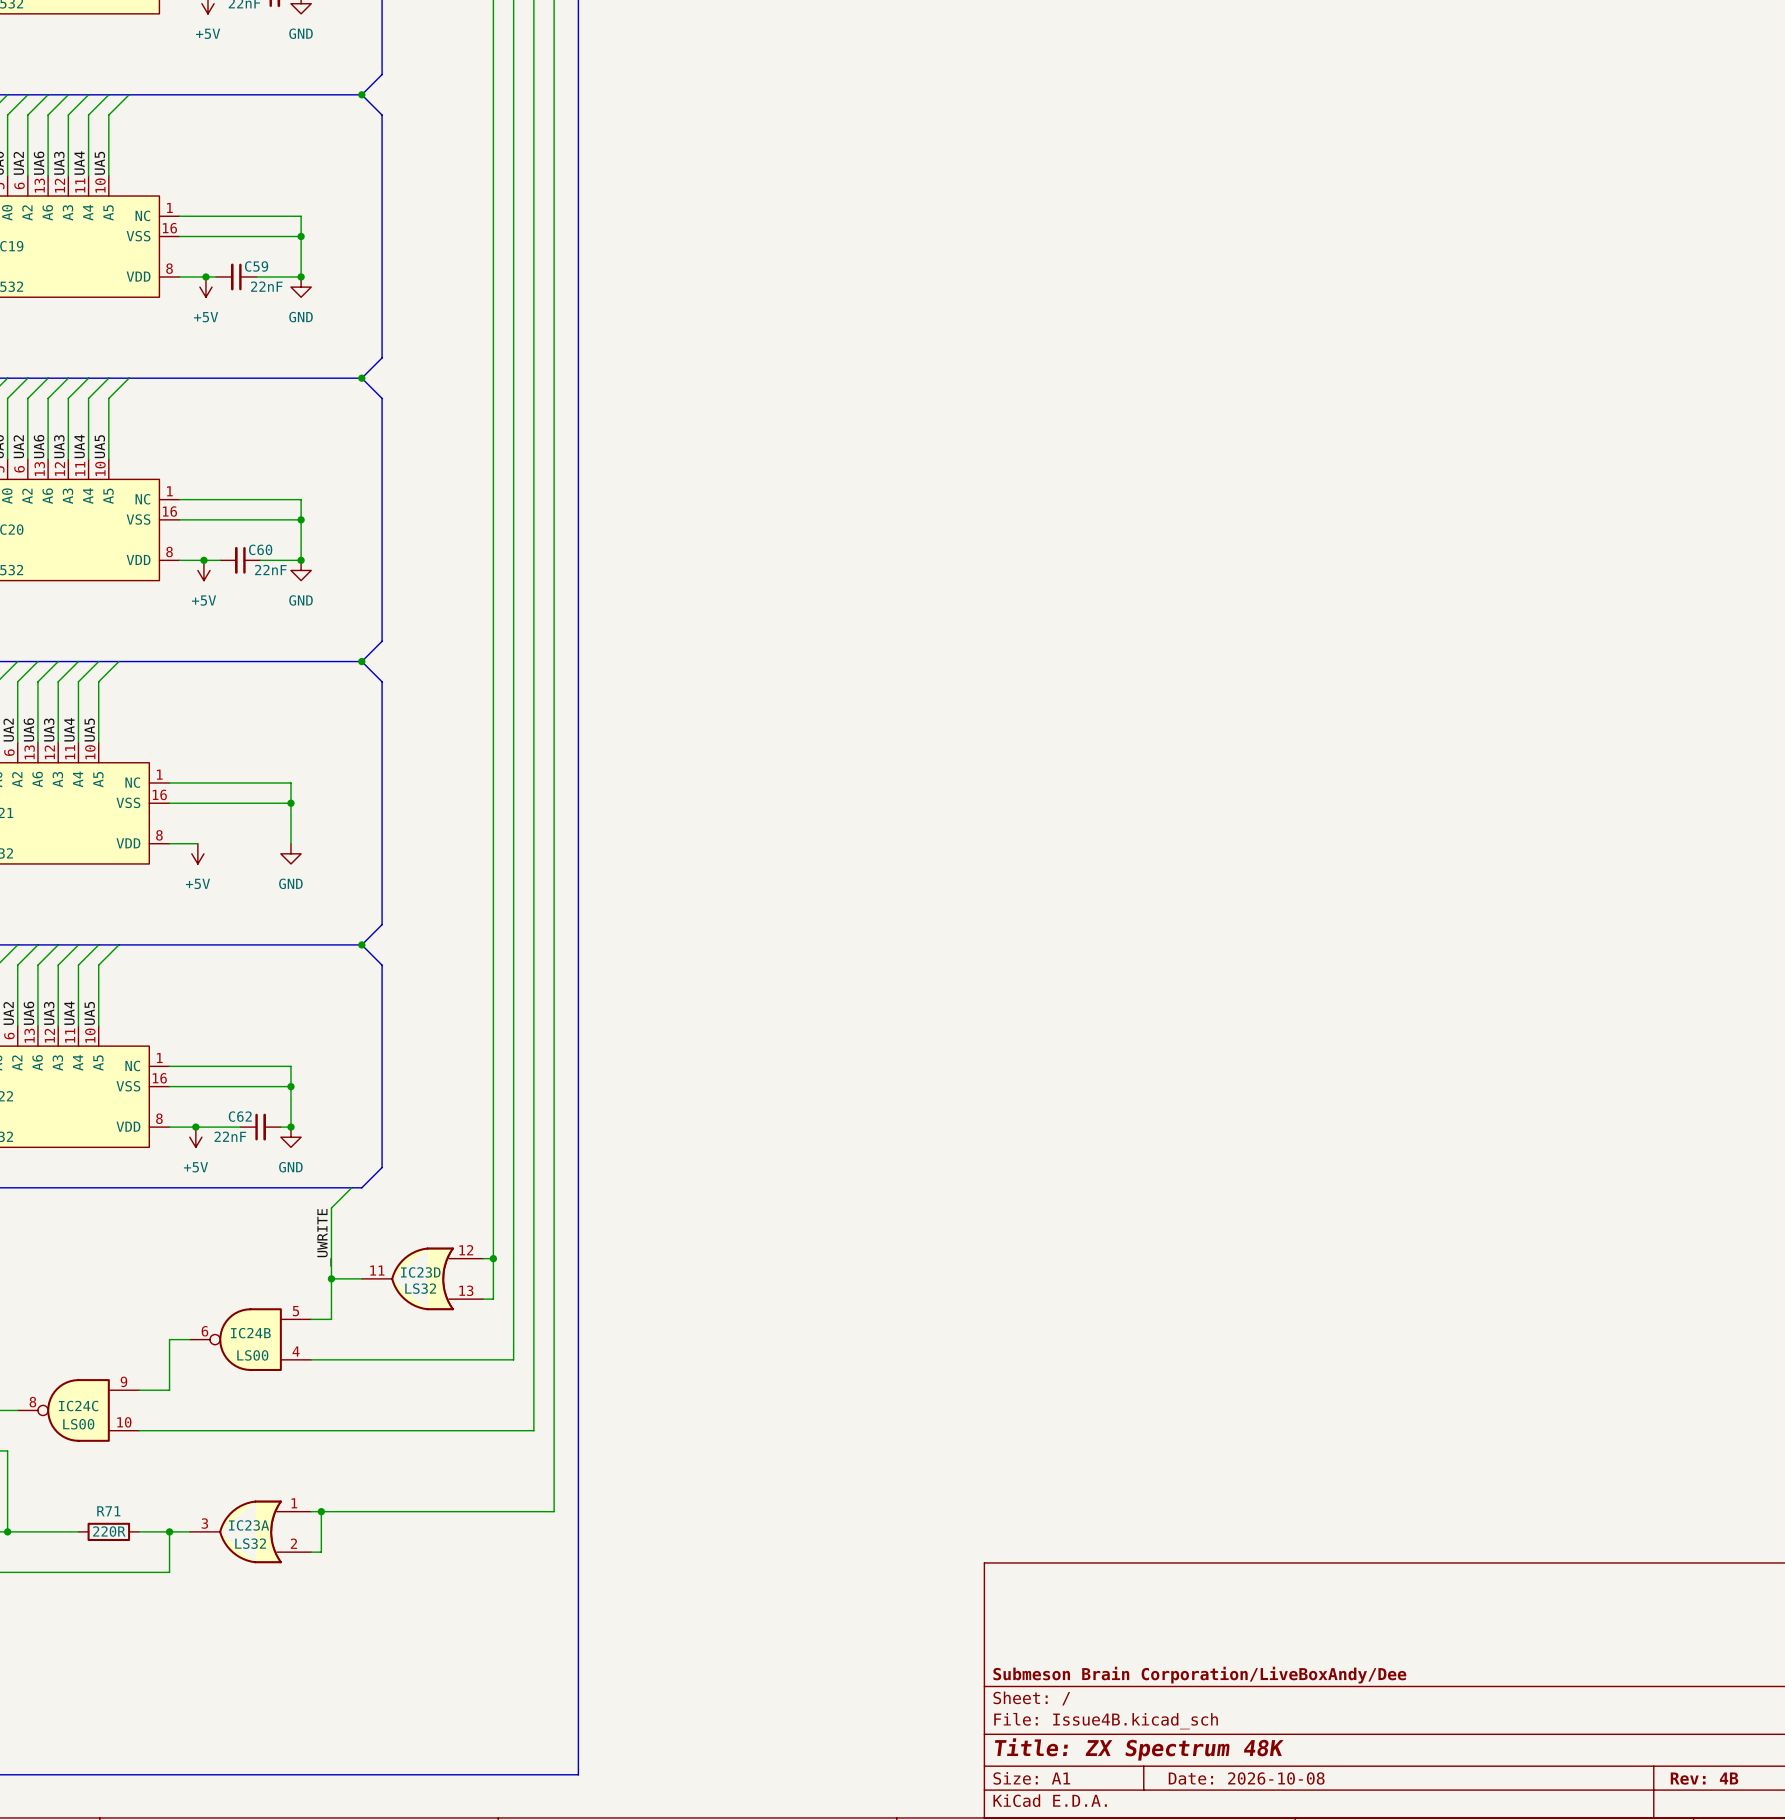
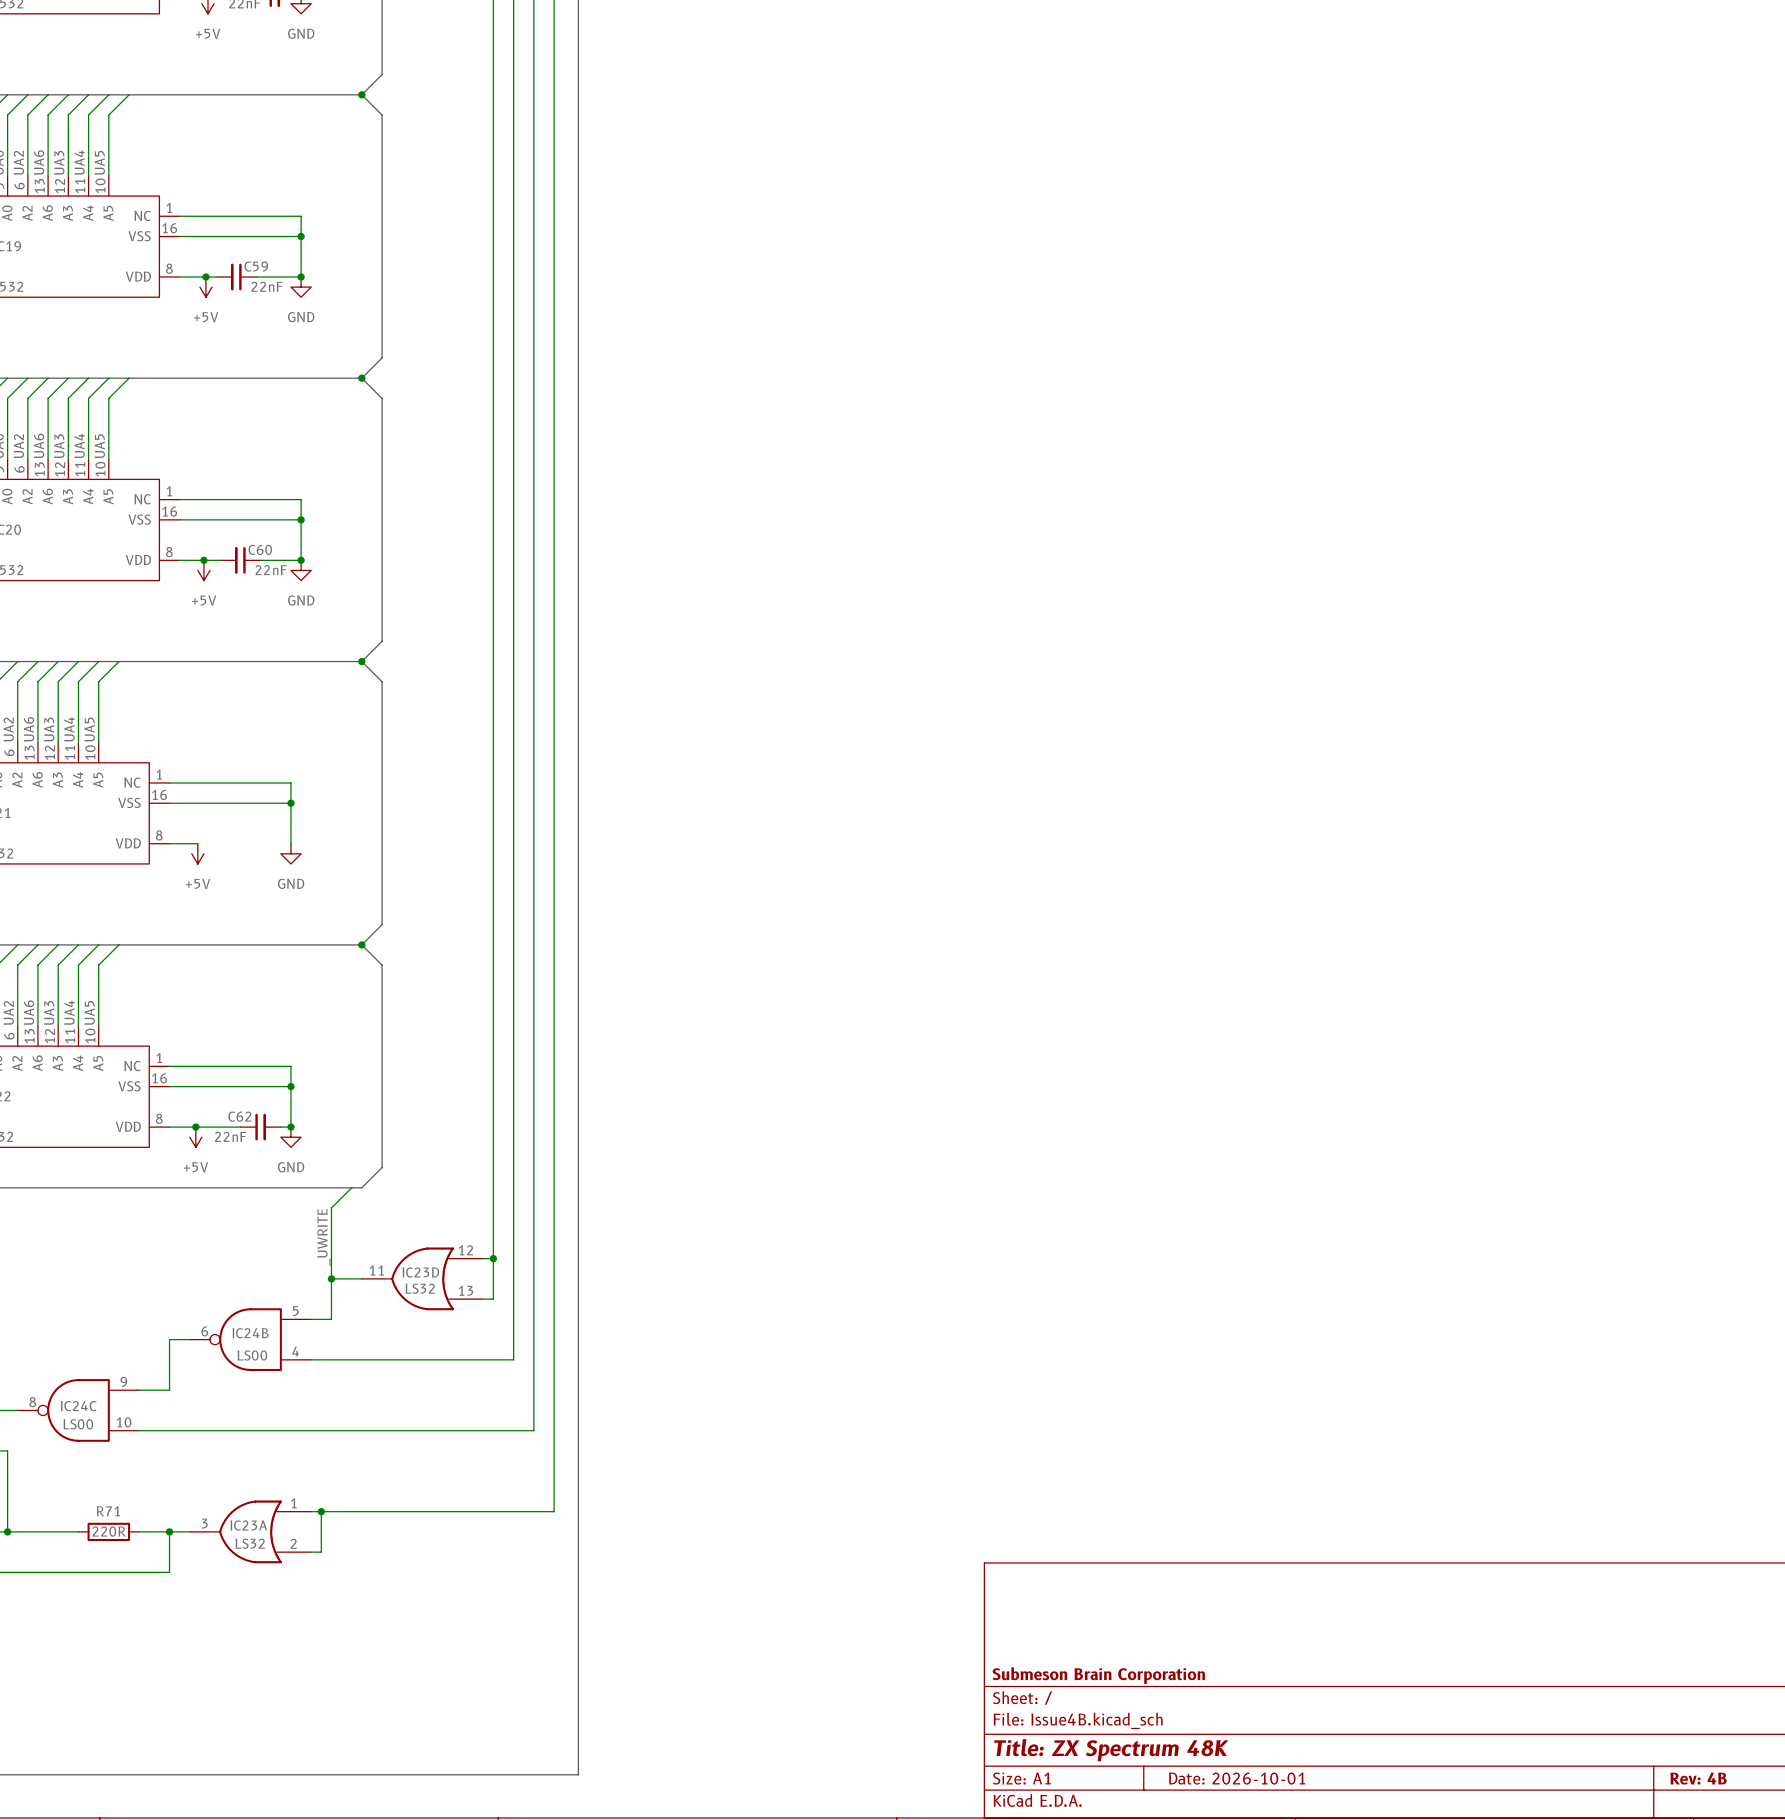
title block: Submeson Brain Corporation/LiveBoxAndy/Dee (1199, 1675) -> Submeson Brain Corporation (1098, 1675)
title block: Date: 2026-10-08 (1246, 1778) -> Date: 2026-10-01 (1237, 1778)

